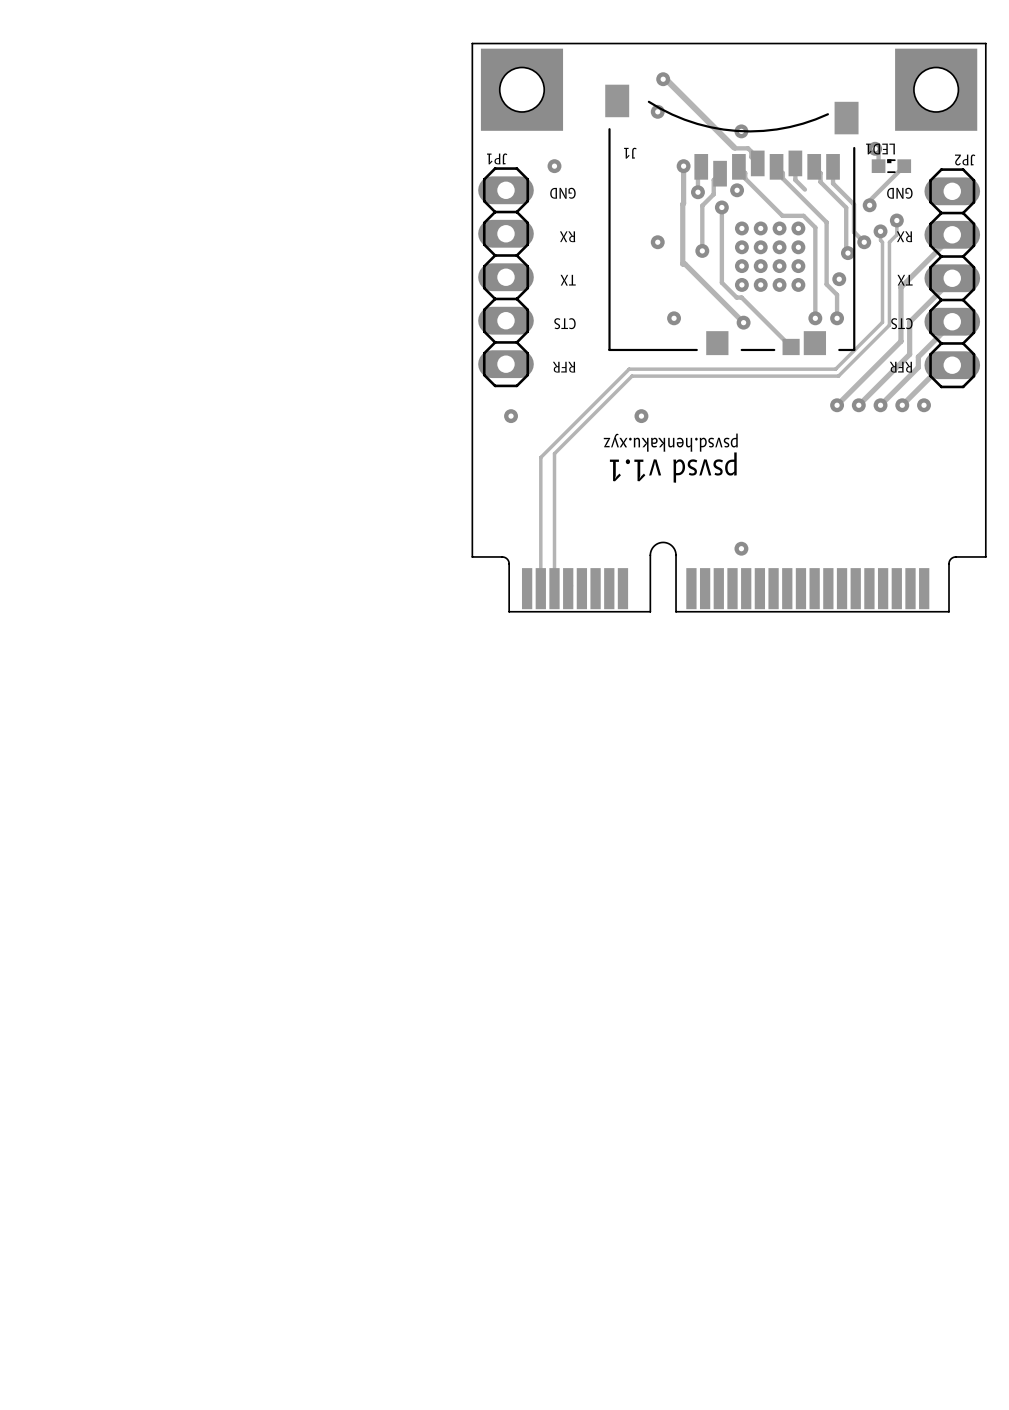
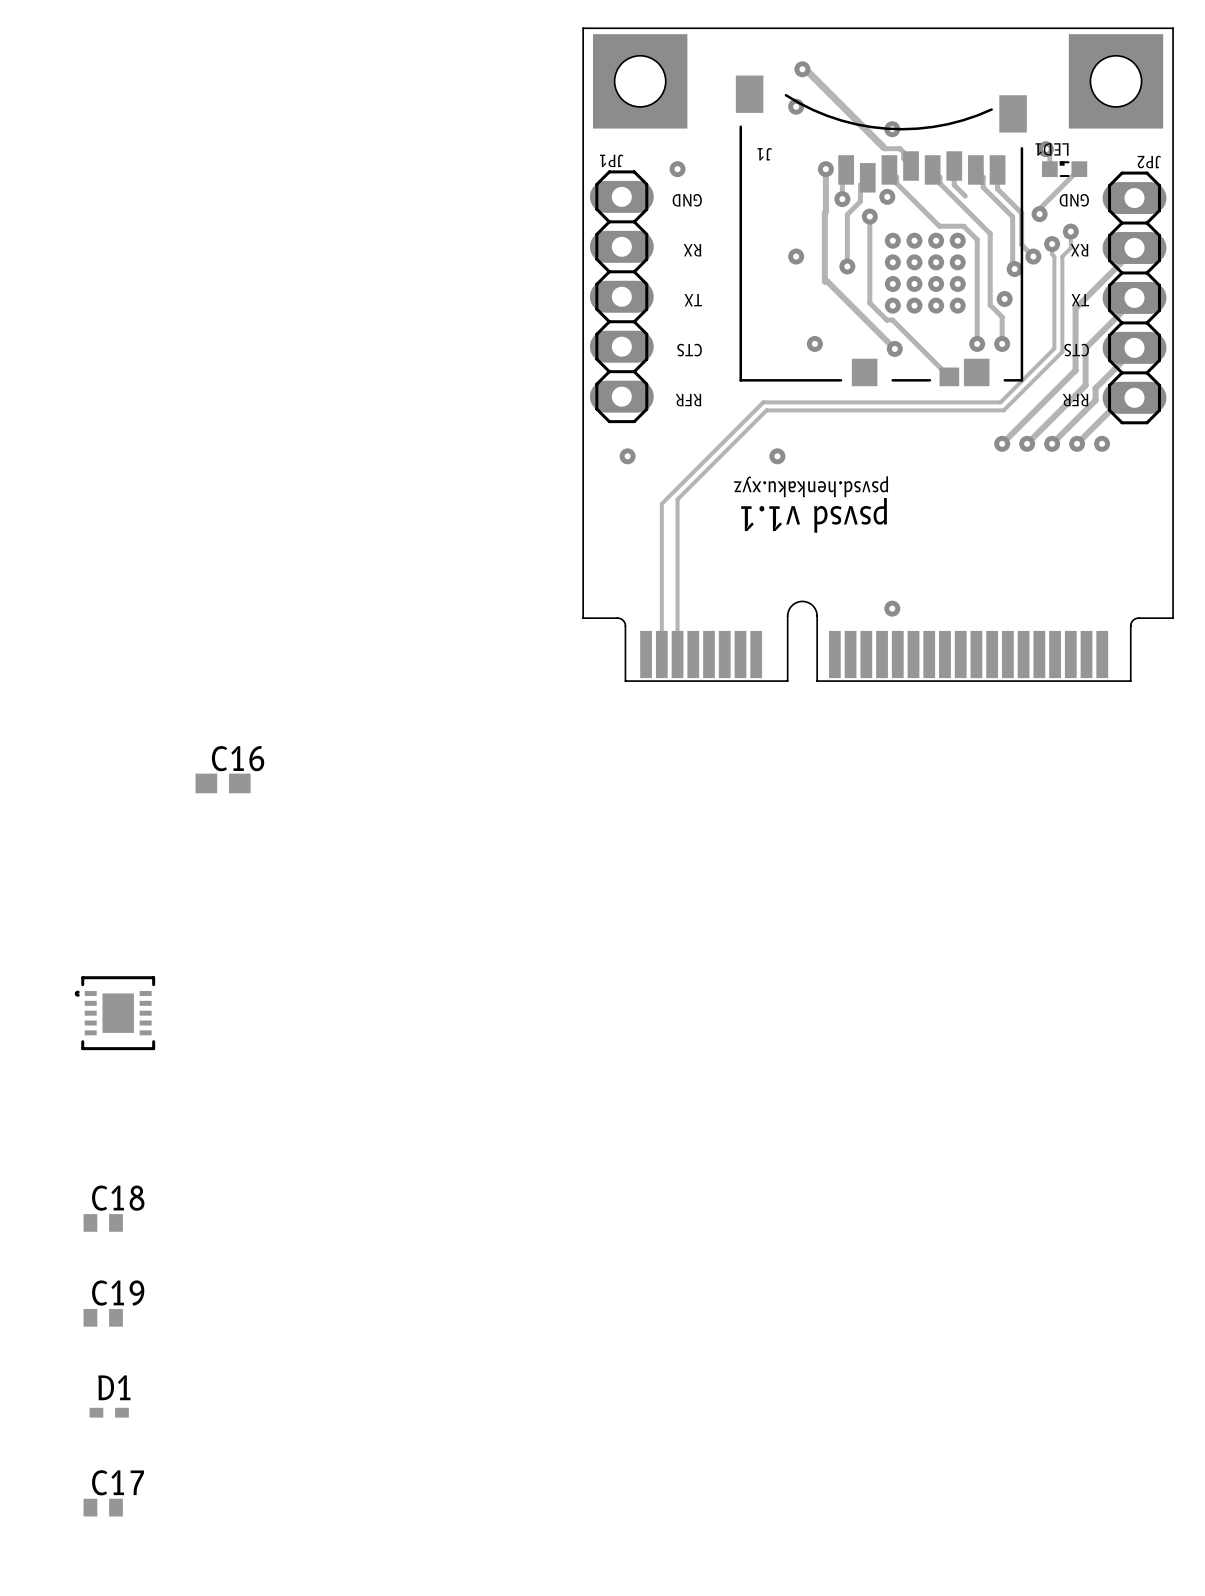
C16: none -> (223, 783)
part: none -> (114, 1013)
C18: none -> (103, 1222)
C19: none -> (103, 1317)
D1: none -> (109, 1412)
C17: none -> (103, 1507)

